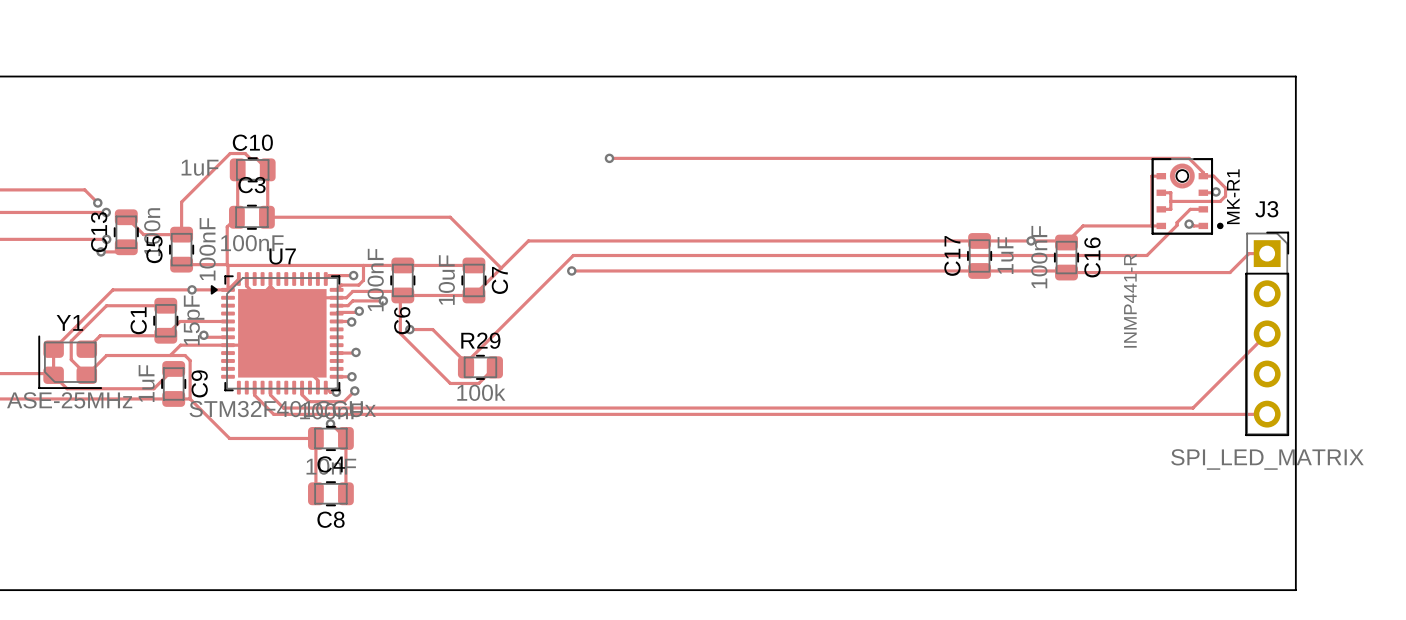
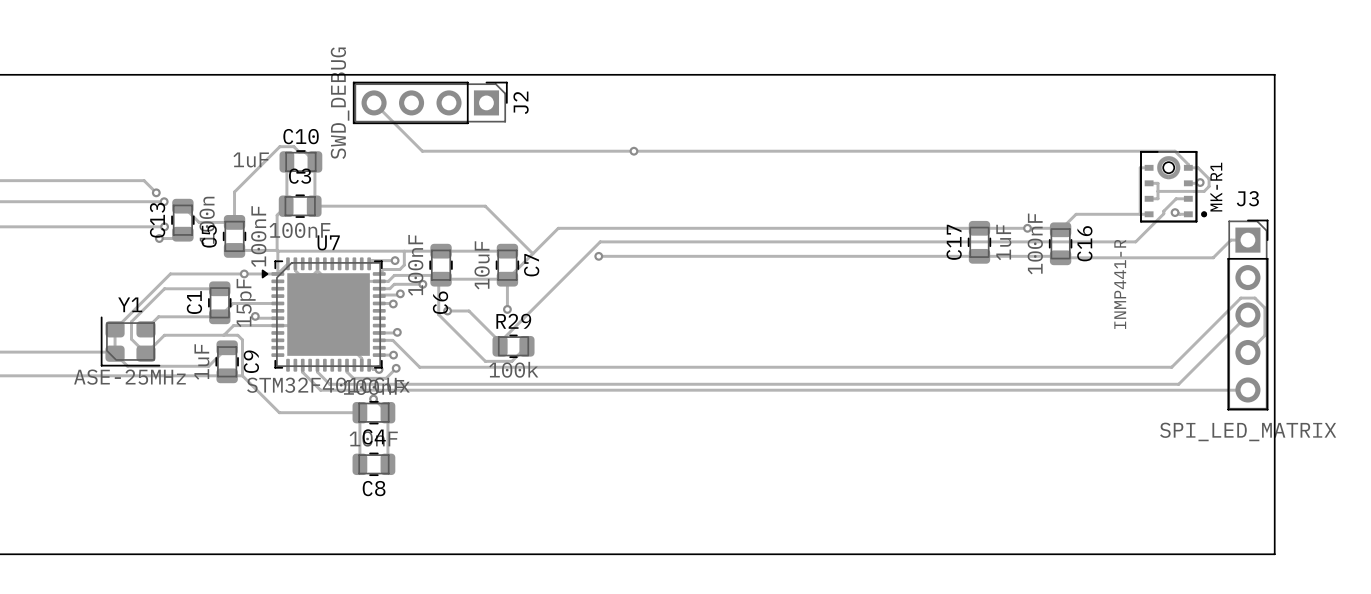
track: none -> (374, 102) (422, 151) (633, 151)
J2: none -> SWD_DEBUG (430, 102)
track: none -> (507, 279) (507, 309)
via: none -> (507, 309)
track: none -> (379, 340) (392, 340) (419, 367) (1171, 367) (1240, 298) (1254, 298) (1264, 308) (1264, 335) (1247, 352)

